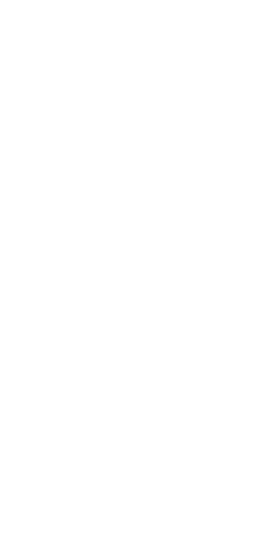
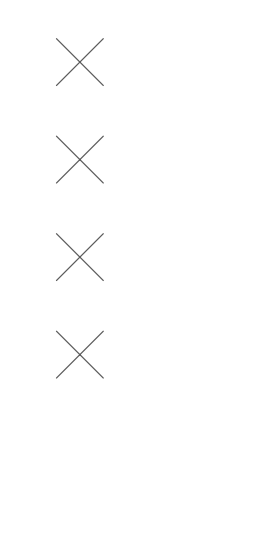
no-connect mark: none -> (79, 62)
no-connect mark: none -> (79, 159)
no-connect mark: none -> (79, 257)
no-connect mark: none -> (79, 354)

